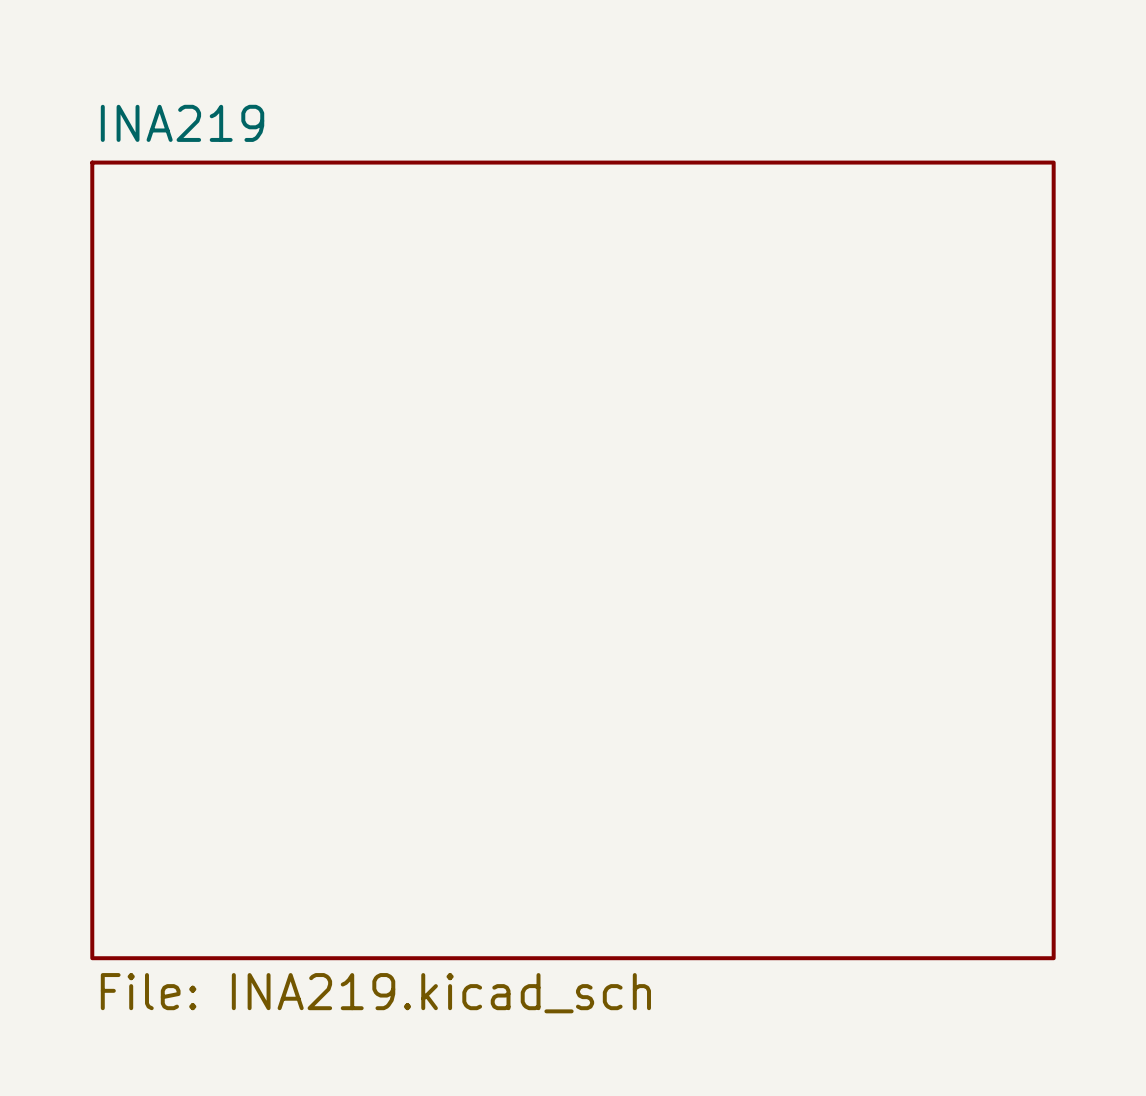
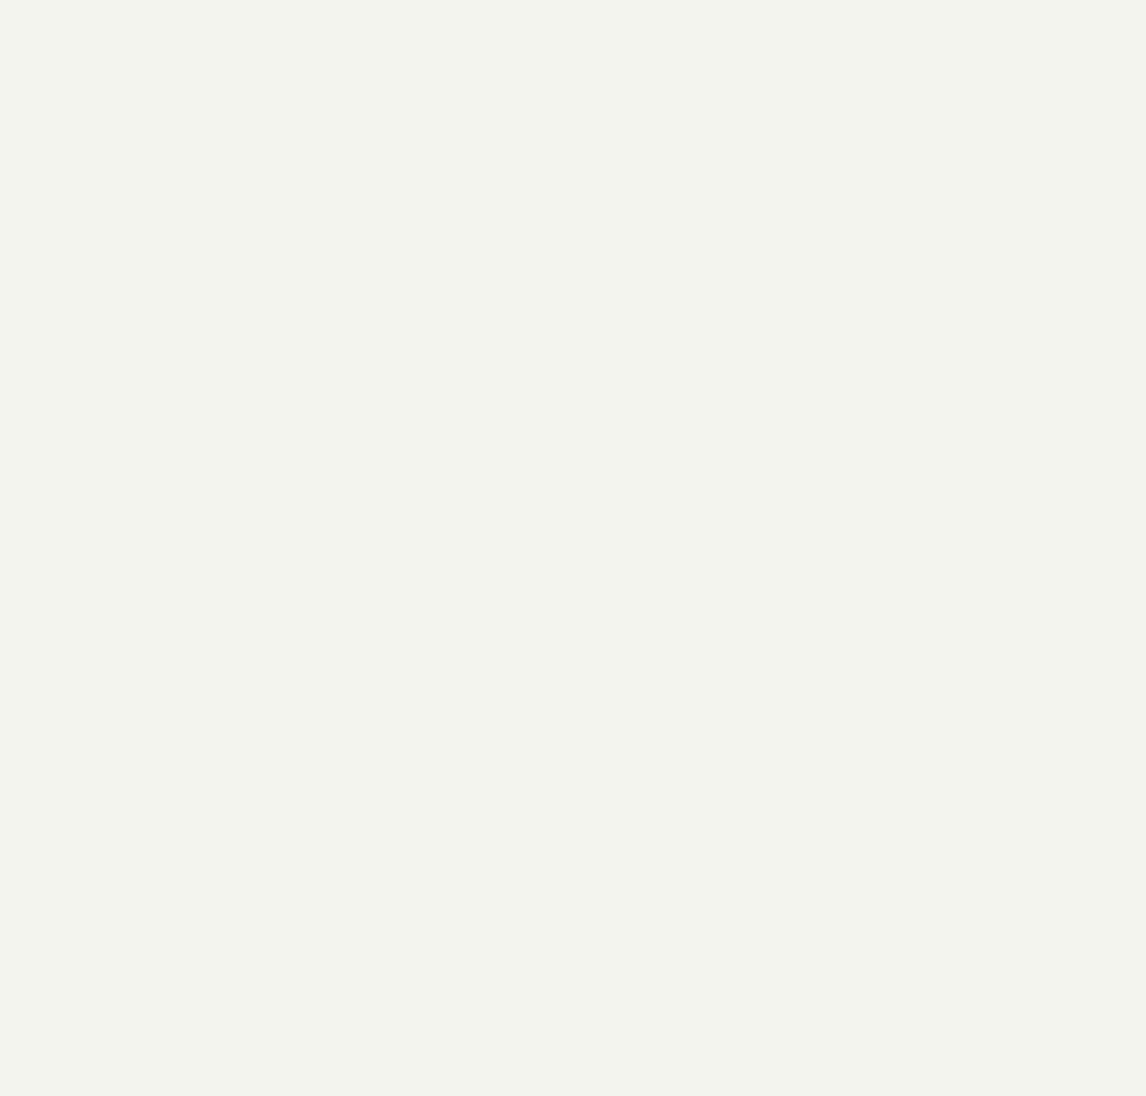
sheet INA219: File: INA219.kicad_sch (572, 560) -> none

